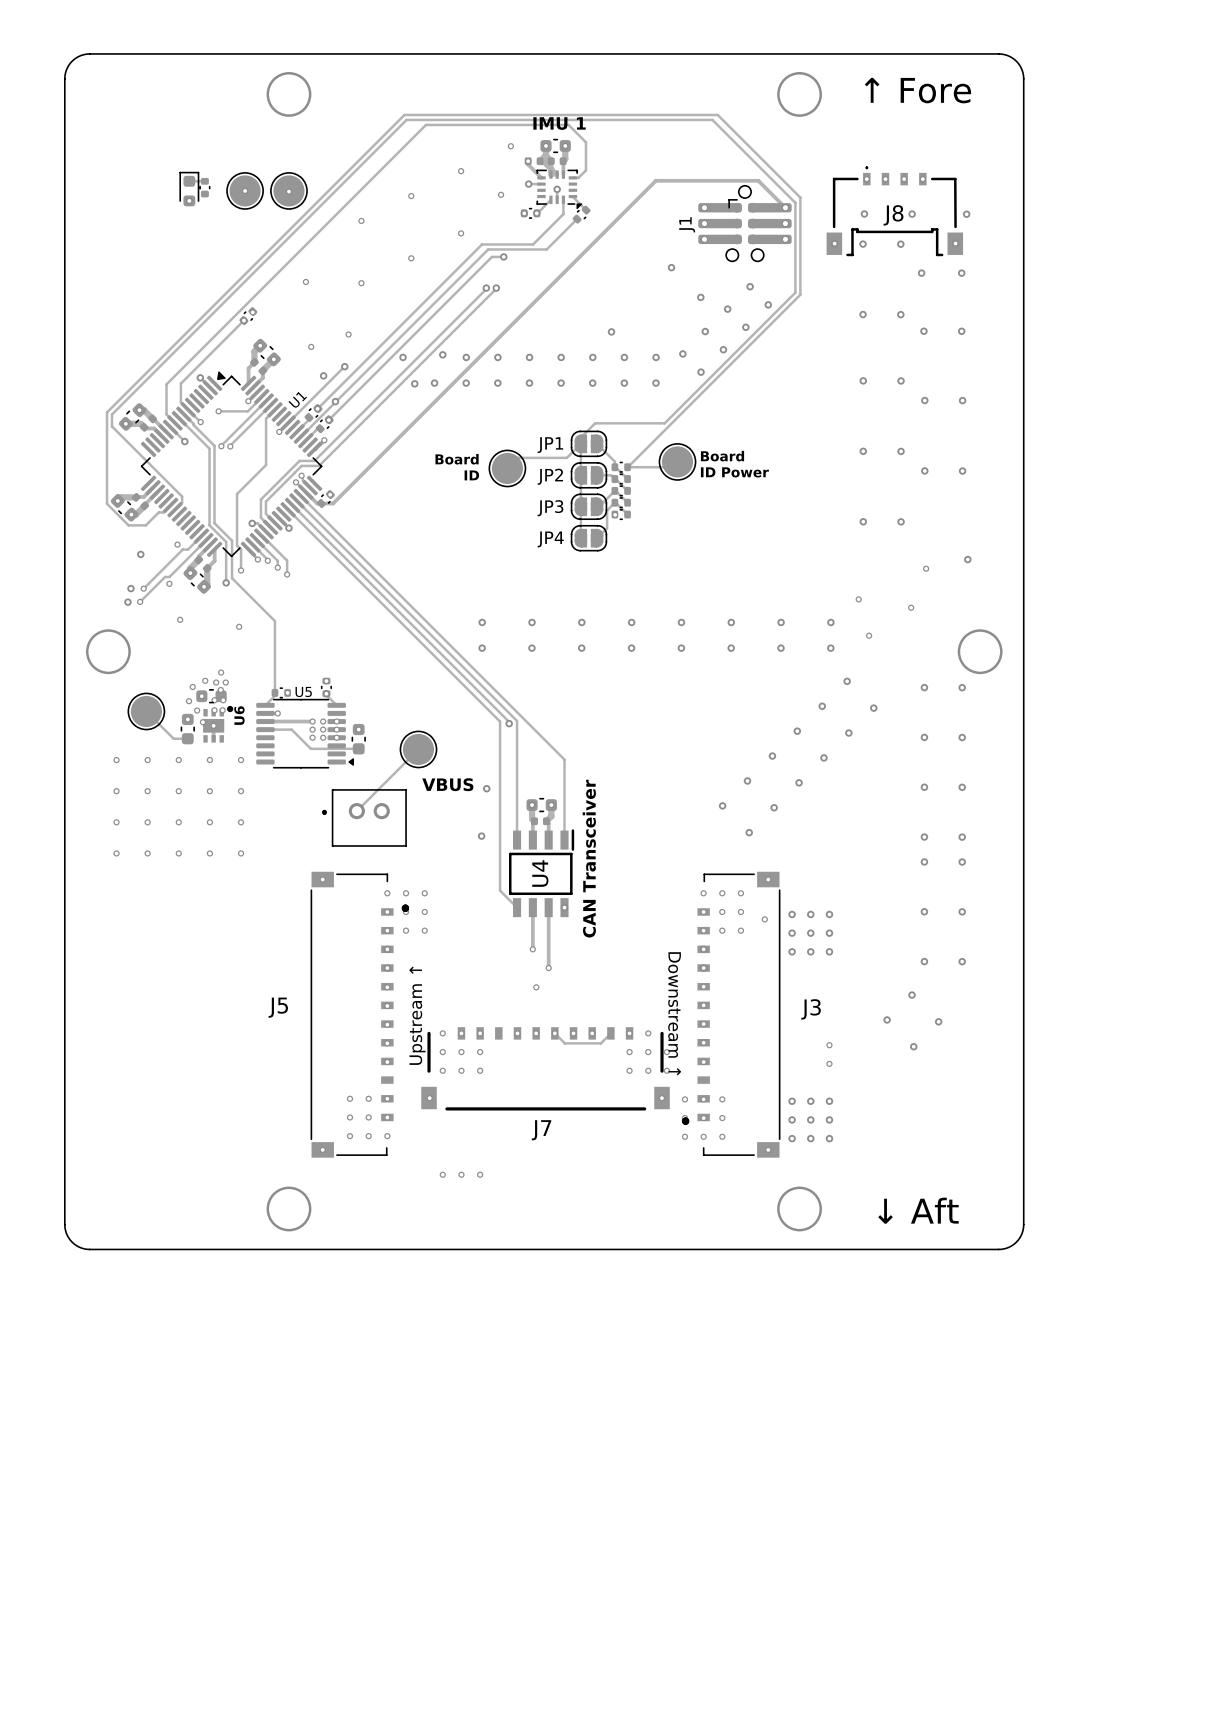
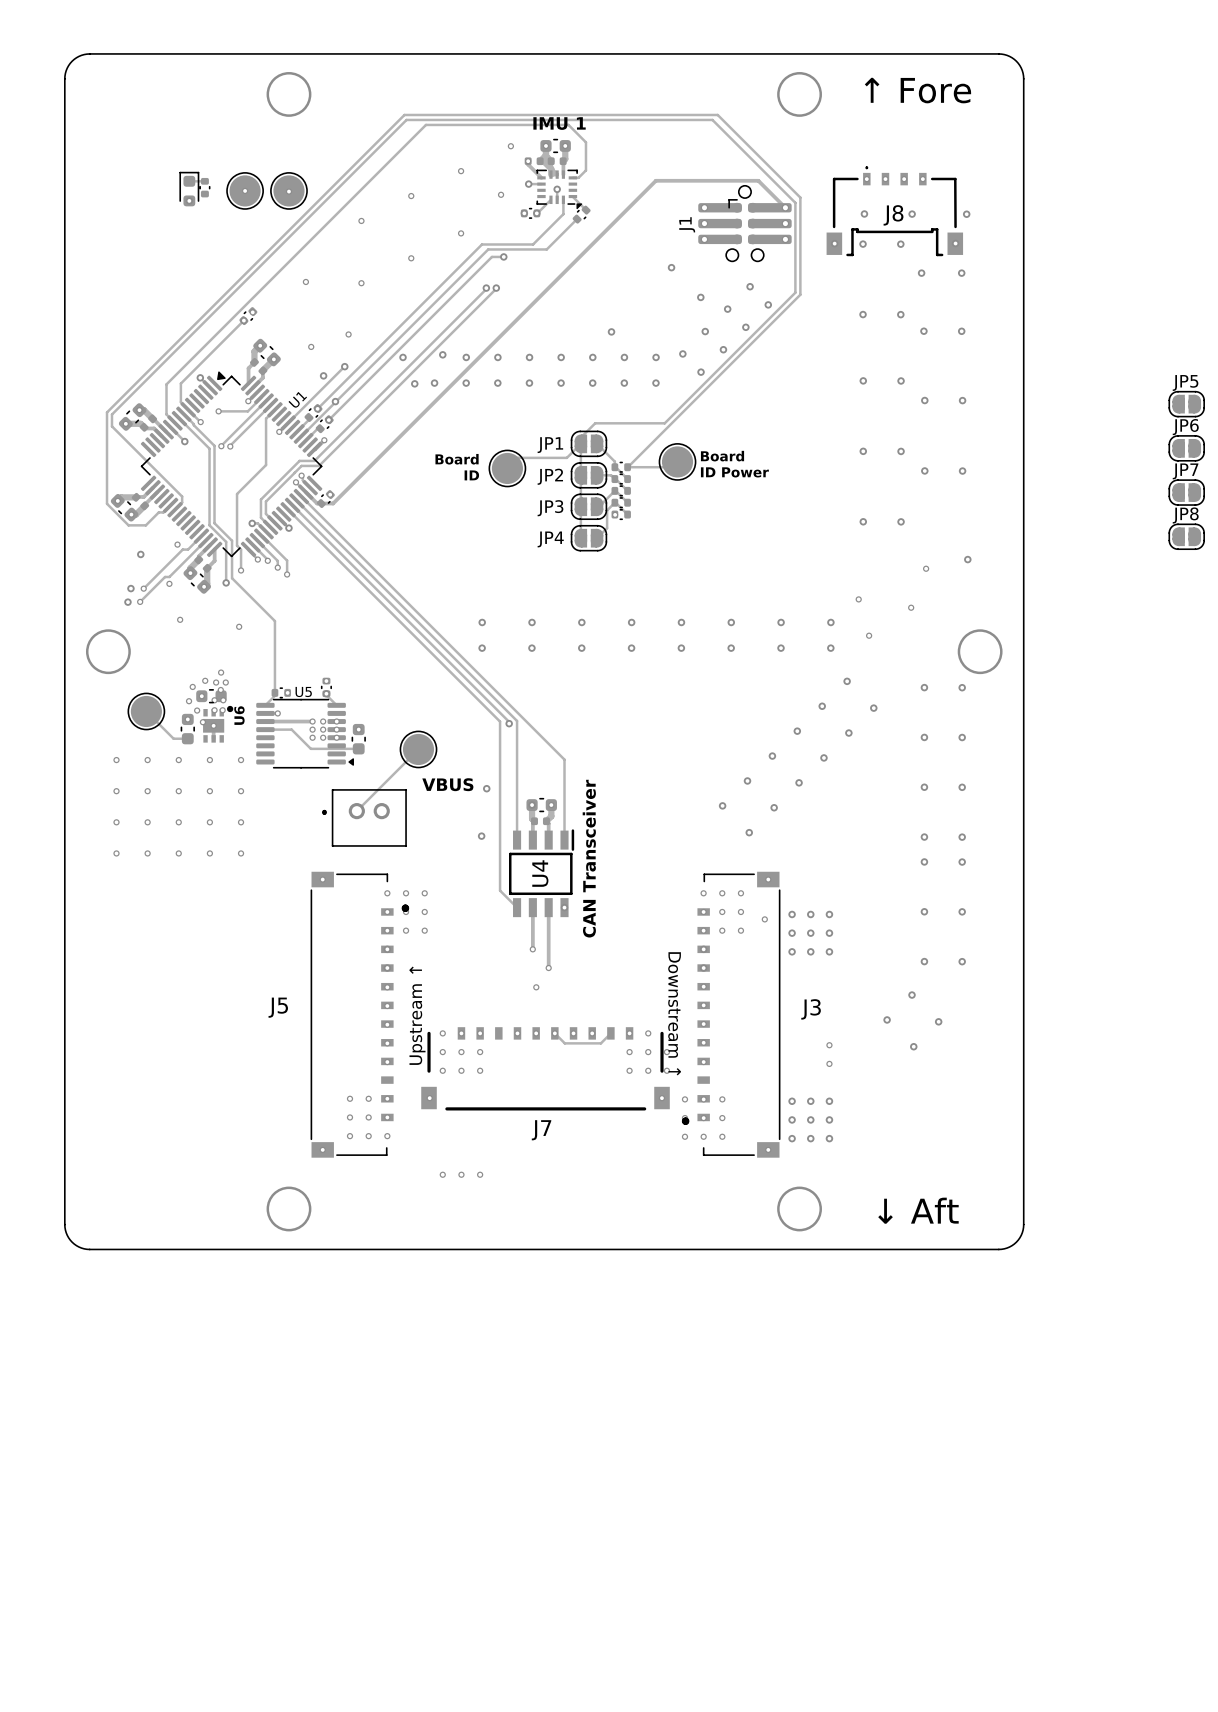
JP5: none -> (1186, 404)
JP6: none -> (1186, 448)
JP7: none -> (1186, 492)
JP8: none -> (1186, 536)

